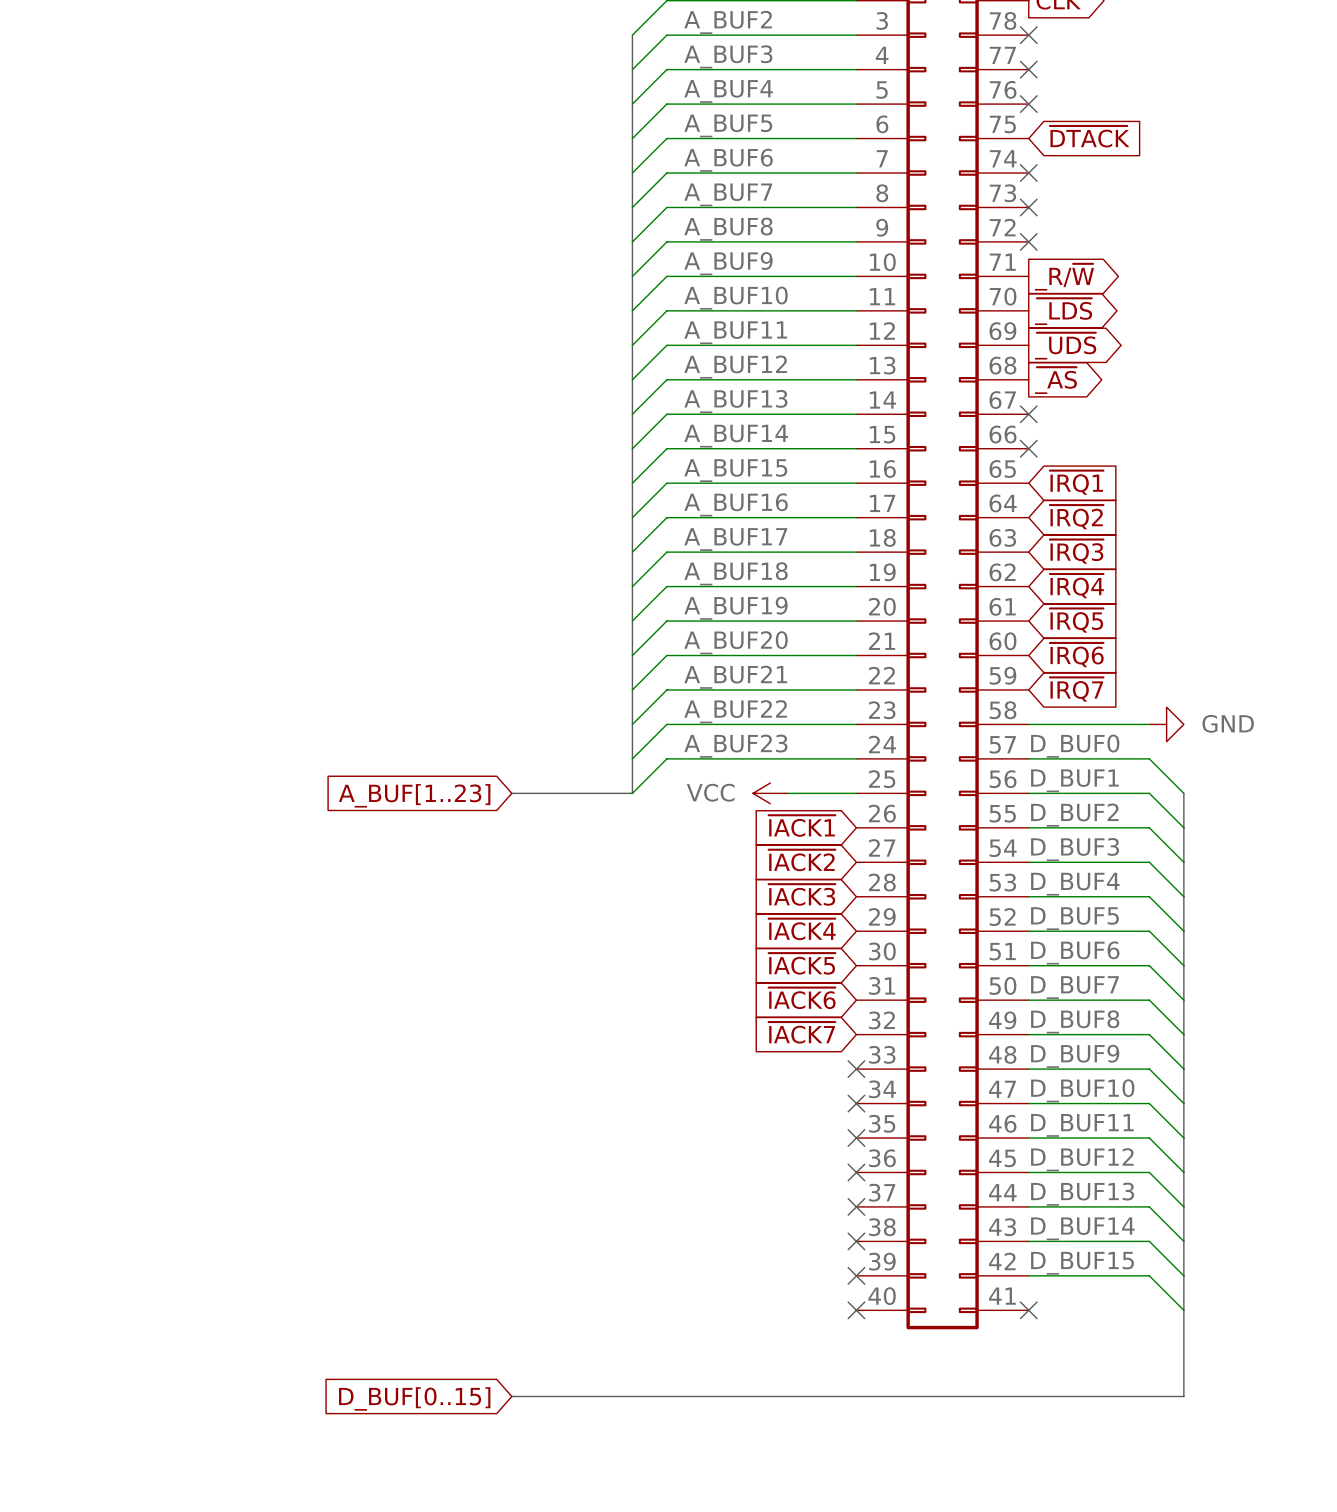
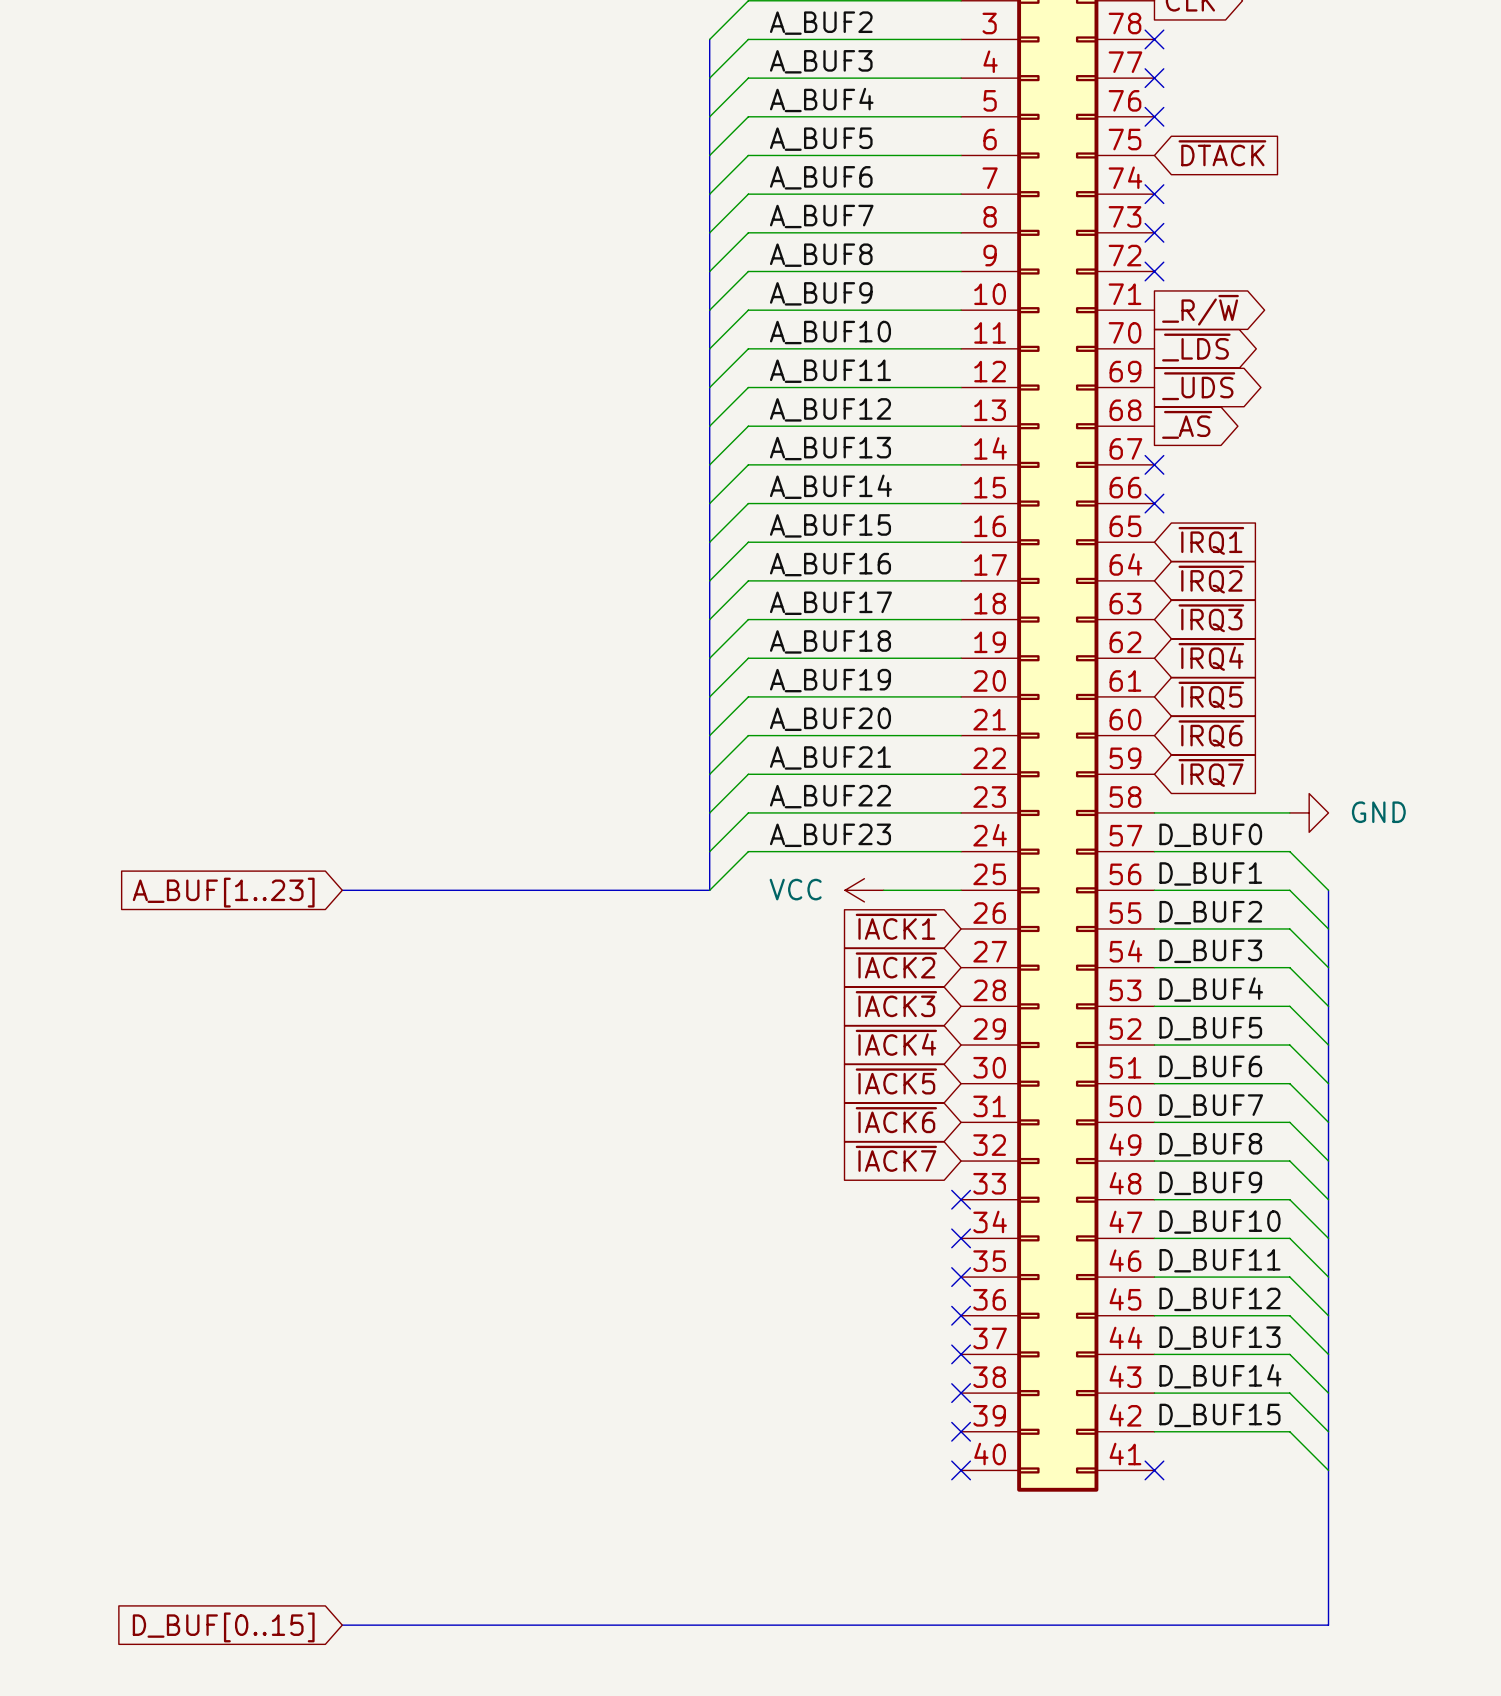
bus: none -> (342, 890) (574, 890)
global label position: A_BUF[1..23] (414, 795) -> A_BUF[1..23] (223, 892)
bus: (511, 1396) (1183, 1396) -> (342, 1625) (1328, 1625) (1328, 1567)
global label position: D_BUF[0..15] (414, 1398) -> D_BUF[0..15] (223, 1627)

